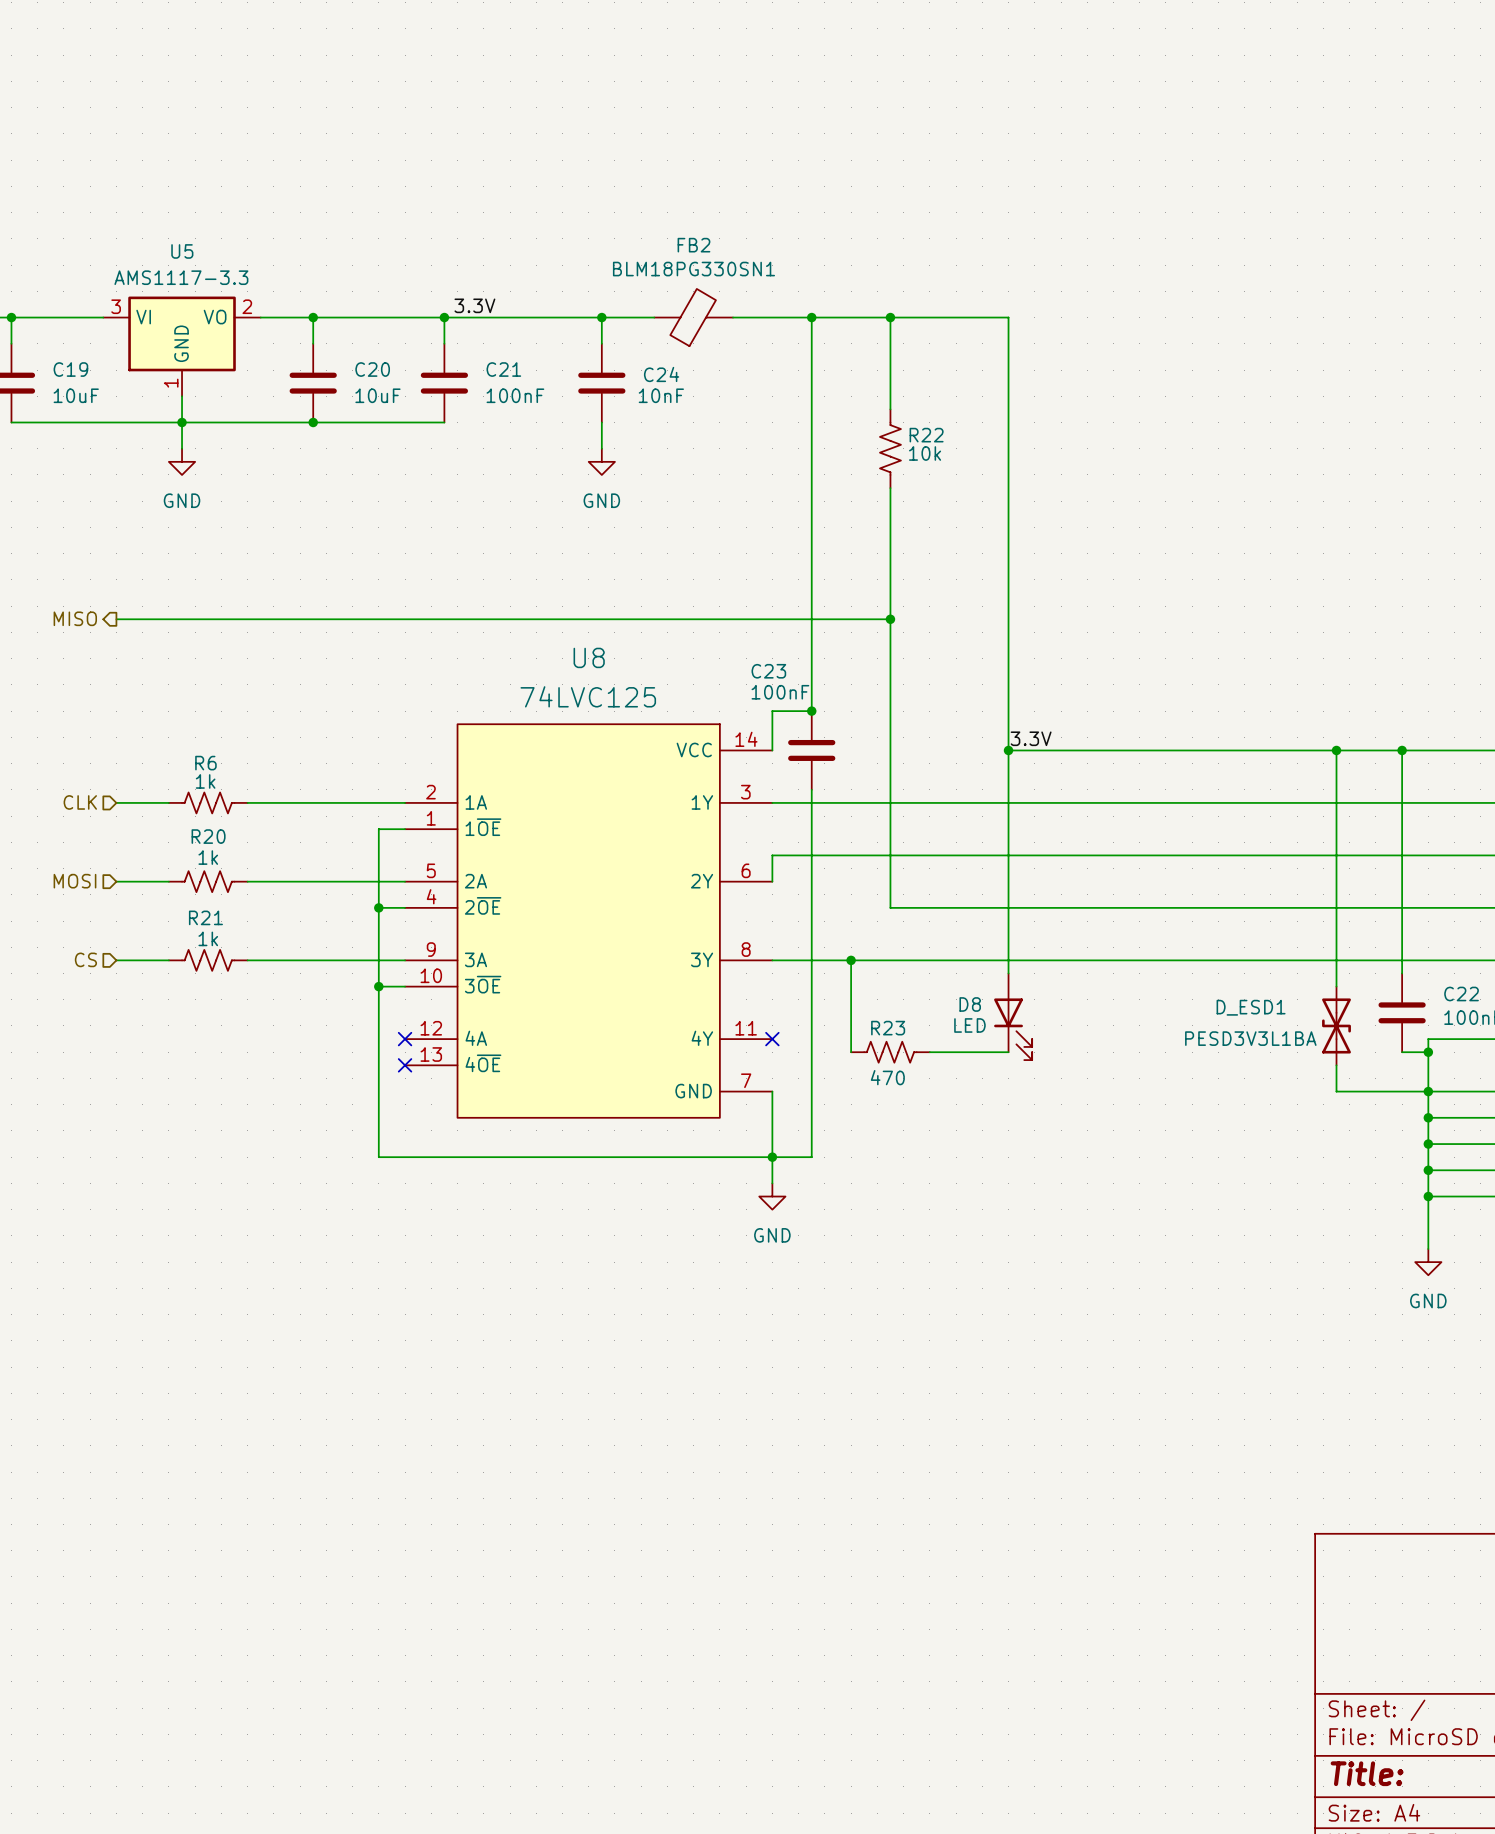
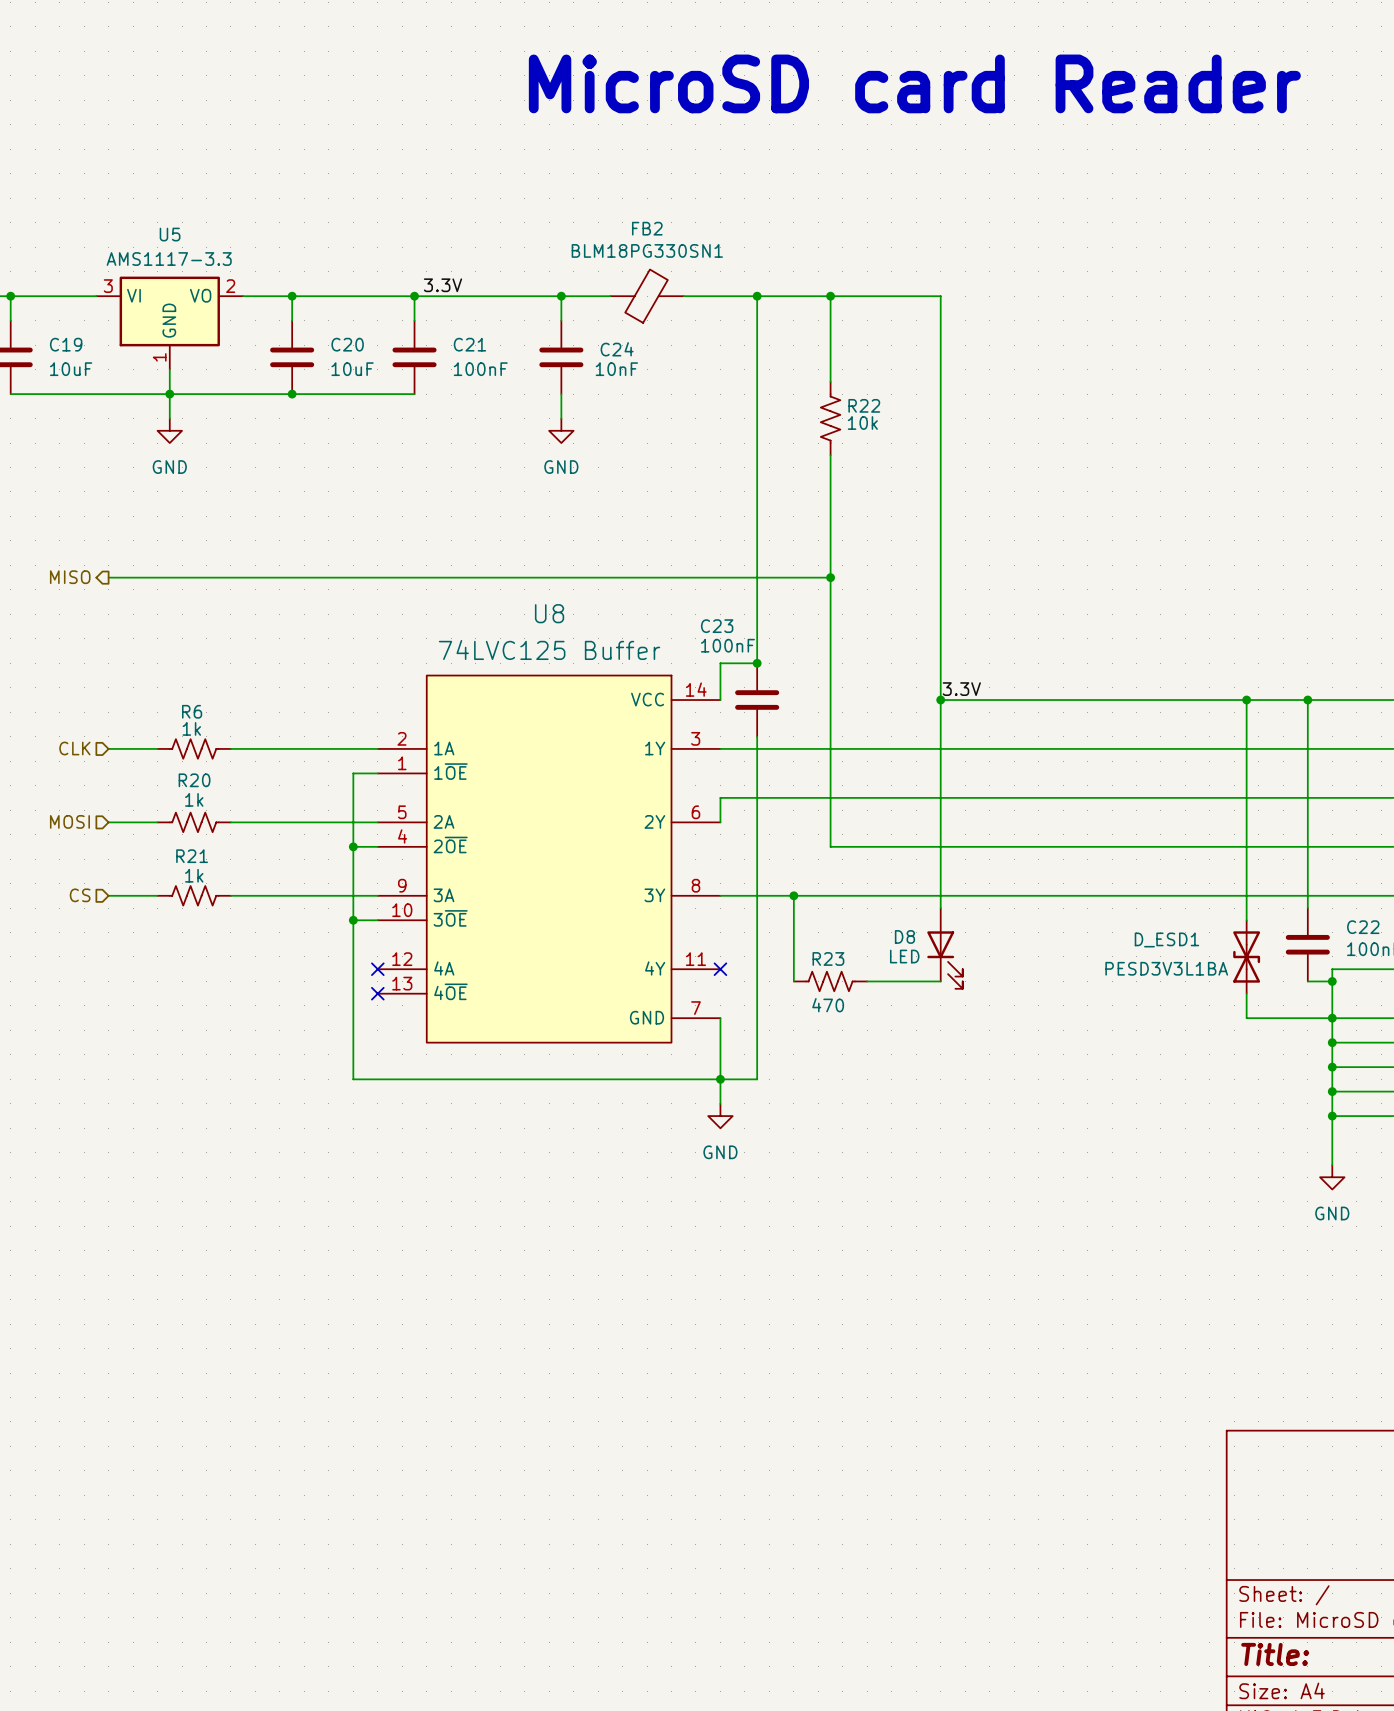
text: none -> MicroSD card Reader (914, 83)
U8 value: 74LVC125 (588, 696) -> 74LVC125 Buffer (549, 649)

